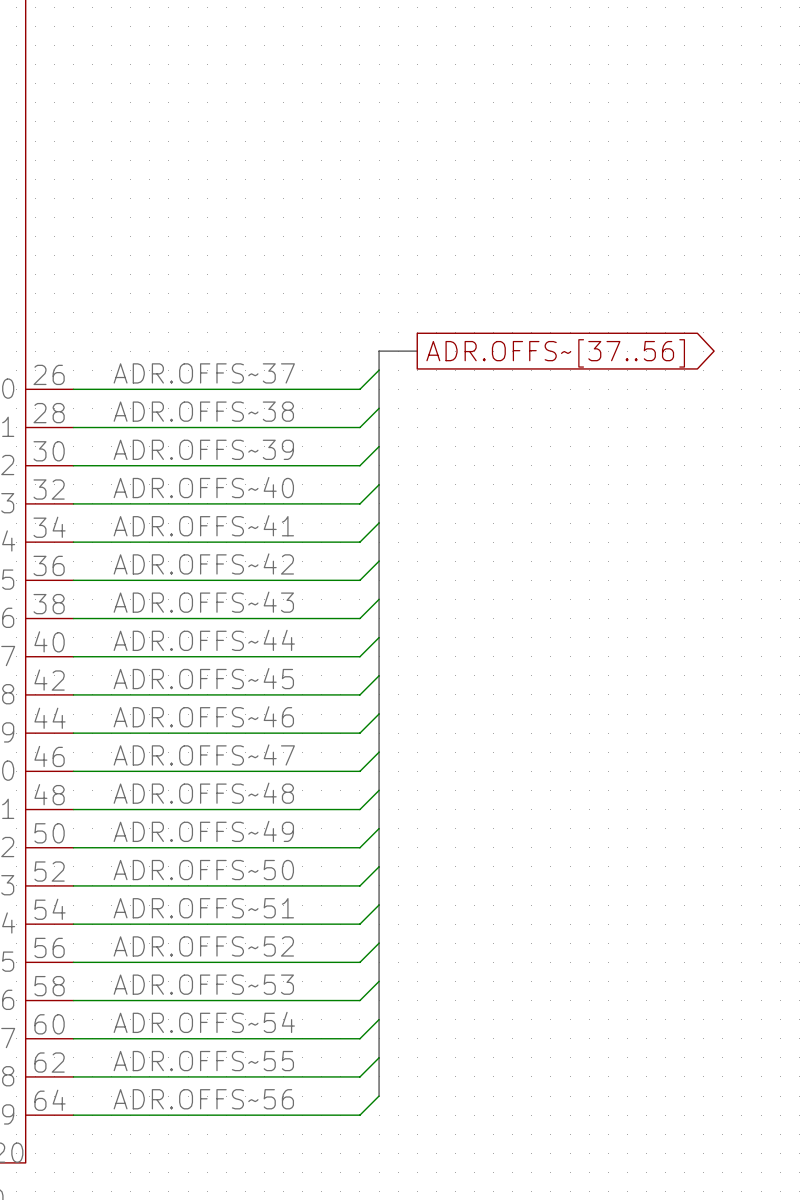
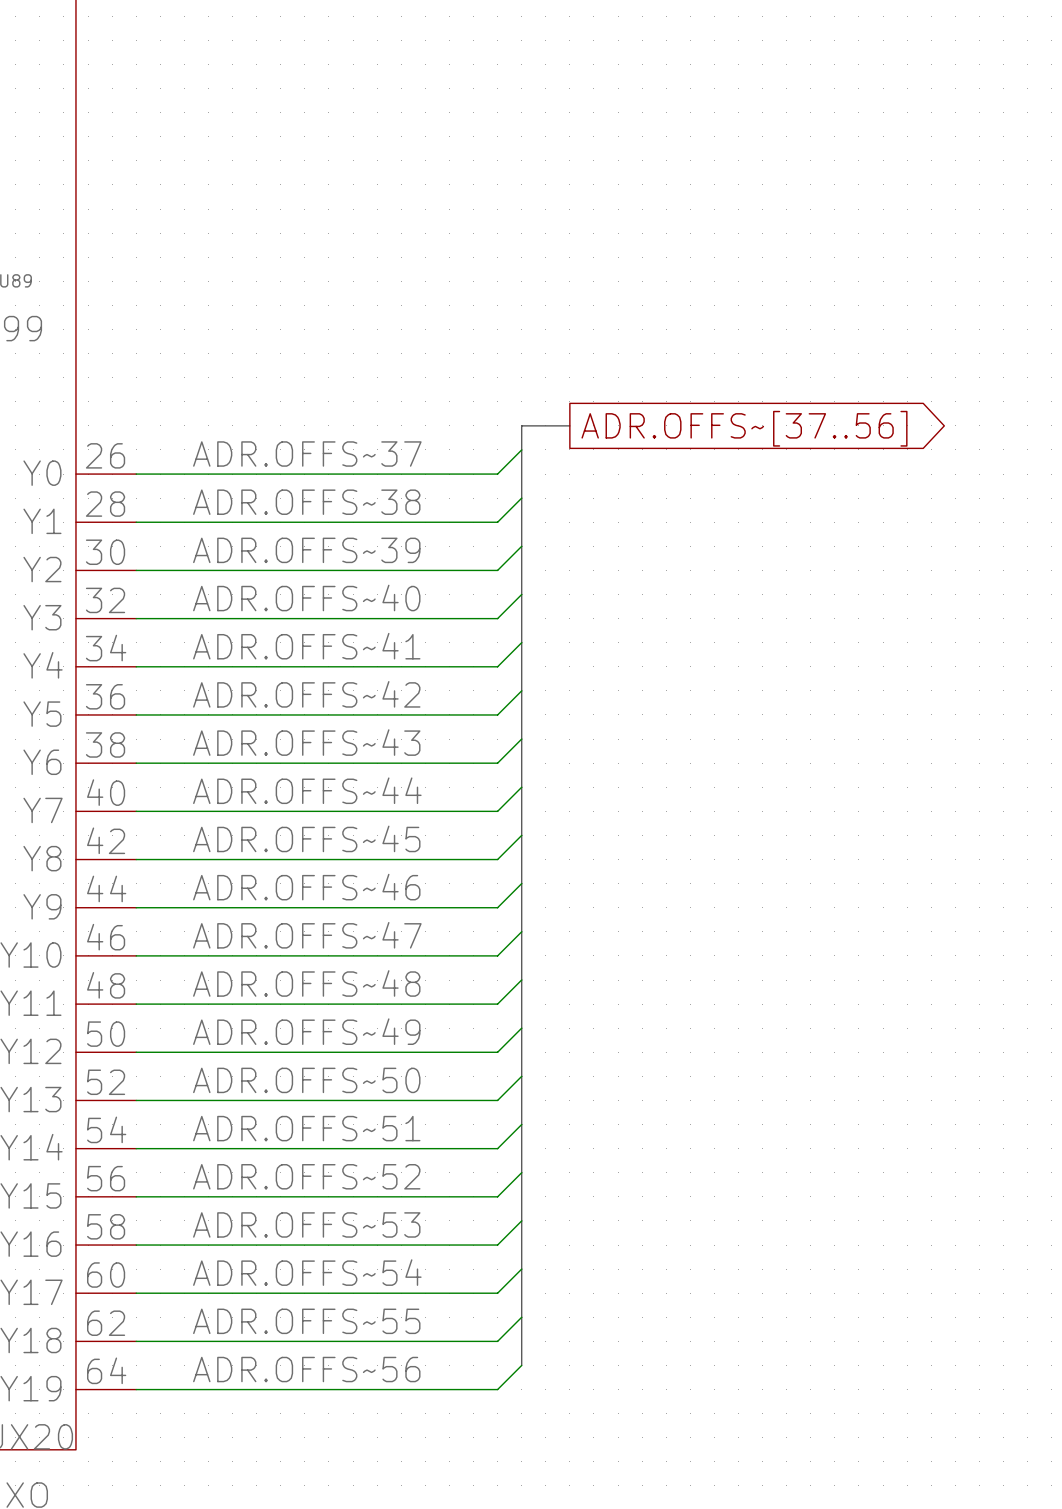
label: ADR.OFFS~37 (204, 373) -> none
label: none -> ADR.OFFS~37 (307, 454)
label: ADR.OFFS~38 (203, 411) -> none
label: none -> ADR.OFFS~38 (306, 502)
label: ADR.OFFS~39 (203, 449) -> none
label: none -> ADR.OFFS~39 (306, 550)
label: ADR.OFFS~40 (203, 487) -> none
label: none -> ADR.OFFS~40 (306, 597)
label: ADR.OFFS~41 (203, 525) -> none
label: none -> ADR.OFFS~41 (306, 646)
label: ADR.OFFS~42 (203, 563) -> none
label: none -> ADR.OFFS~42 (306, 694)
label: ADR.OFFS~43 (203, 602) -> none
label: none -> ADR.OFFS~43 (306, 742)
label: ADR.OFFS~44 (204, 640) -> none
label: none -> ADR.OFFS~44 (307, 790)
label: ADR.OFFS~45 (203, 678) -> none
label: none -> ADR.OFFS~45 (306, 838)
label: ADR.OFFS~46 (203, 716) -> none
label: none -> ADR.OFFS~46 (306, 887)
label: ADR.OFFS~47 (204, 754) -> none
label: none -> ADR.OFFS~47 (307, 935)
label: ADR.OFFS~48 (203, 793) -> none
label: none -> ADR.OFFS~48 (306, 983)
label: ADR.OFFS~49 (203, 831) -> none
label: none -> ADR.OFFS~49 (306, 1031)
label: ADR.OFFS~50 (203, 870) -> none
label: none -> ADR.OFFS~50 (306, 1080)
label: ADR.OFFS~51 (203, 908) -> none
label: none -> ADR.OFFS~51 (306, 1128)
label: ADR.OFFS~52 (203, 946) -> none
label: none -> ADR.OFFS~52 (306, 1176)
label: ADR.OFFS~53 (203, 984) -> none
label: none -> ADR.OFFS~53 (306, 1224)
label: ADR.OFFS~54 (204, 1022) -> none
label: none -> ADR.OFFS~54 (307, 1272)
label: ADR.OFFS~55 (203, 1061) -> none
label: none -> ADR.OFFS~55 (306, 1321)
label: ADR.OFFS~56 (203, 1099) -> none
label: none -> ADR.OFFS~56 (306, 1369)

